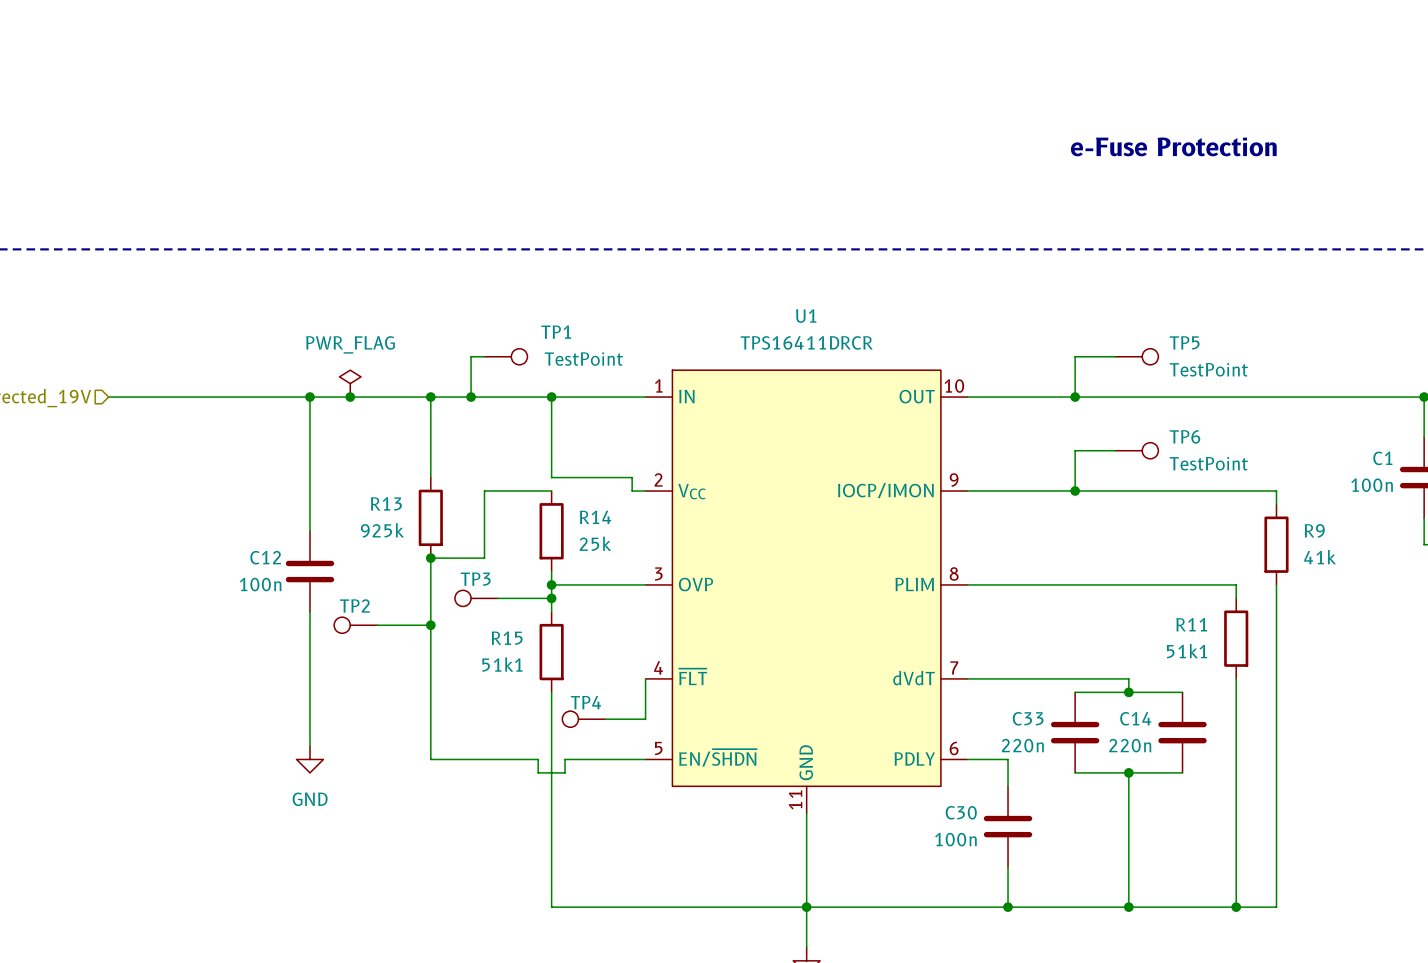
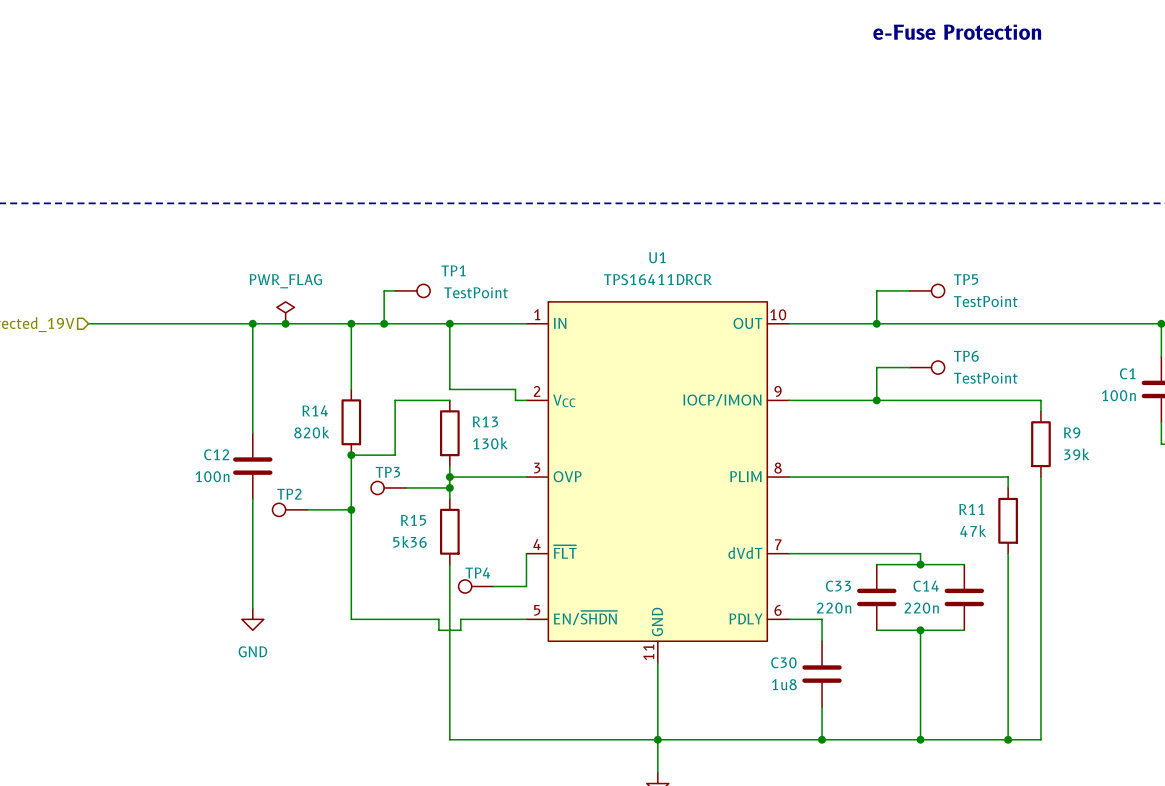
text position: e-Fuse Protection (1173, 146) -> e-Fuse Protection (957, 32)
R13 name: R13 (386, 503) -> R14 (315, 410)
R14 name: R14 (595, 517) -> R13 (485, 421)
R13 value: 925k (382, 530) -> 820k (311, 432)
R14 value: 25k (595, 543) -> 130k (490, 443)
R9 value: 41k (1320, 557) -> 39k (1076, 454)
R11 value: 51k1 (1187, 651) -> 47k (973, 531)
R15 value: 51k1 (502, 664) -> 5k36 (410, 542)
C30 value: 100n (955, 839) -> 1u8 (784, 684)

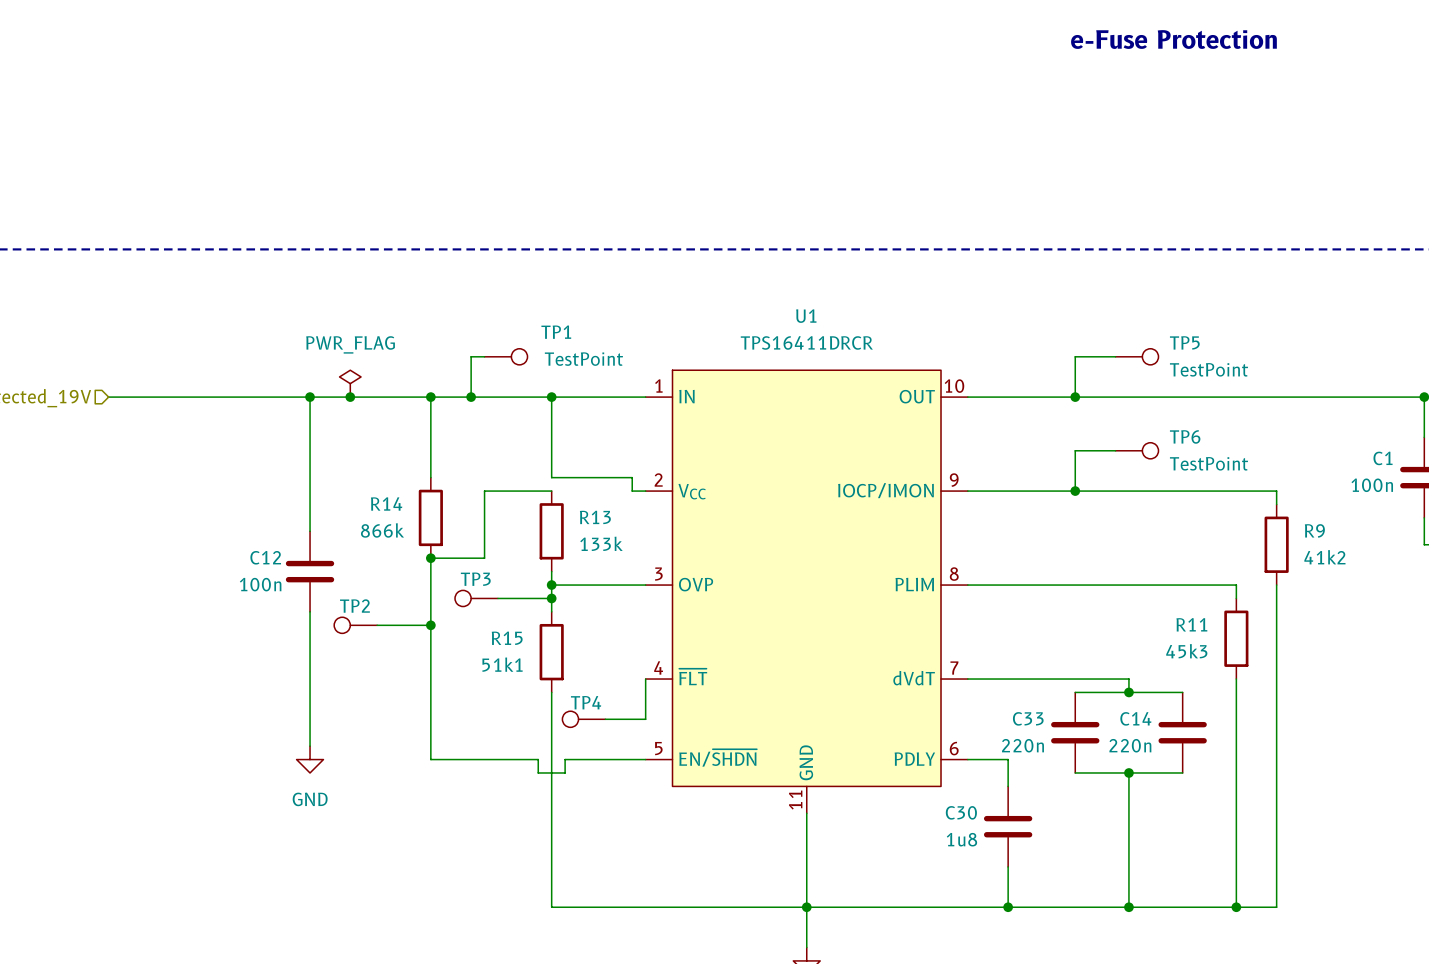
R14 value: 820k (311, 432) -> 866k (382, 530)
R13 value: 130k (490, 443) -> 133k (601, 543)
R9 value: 39k (1076, 454) -> 41k2 (1324, 557)
R11 value: 47k (973, 531) -> 45k3 (1186, 651)
R15 value: 5k36 (410, 542) -> 51k1 (502, 664)

